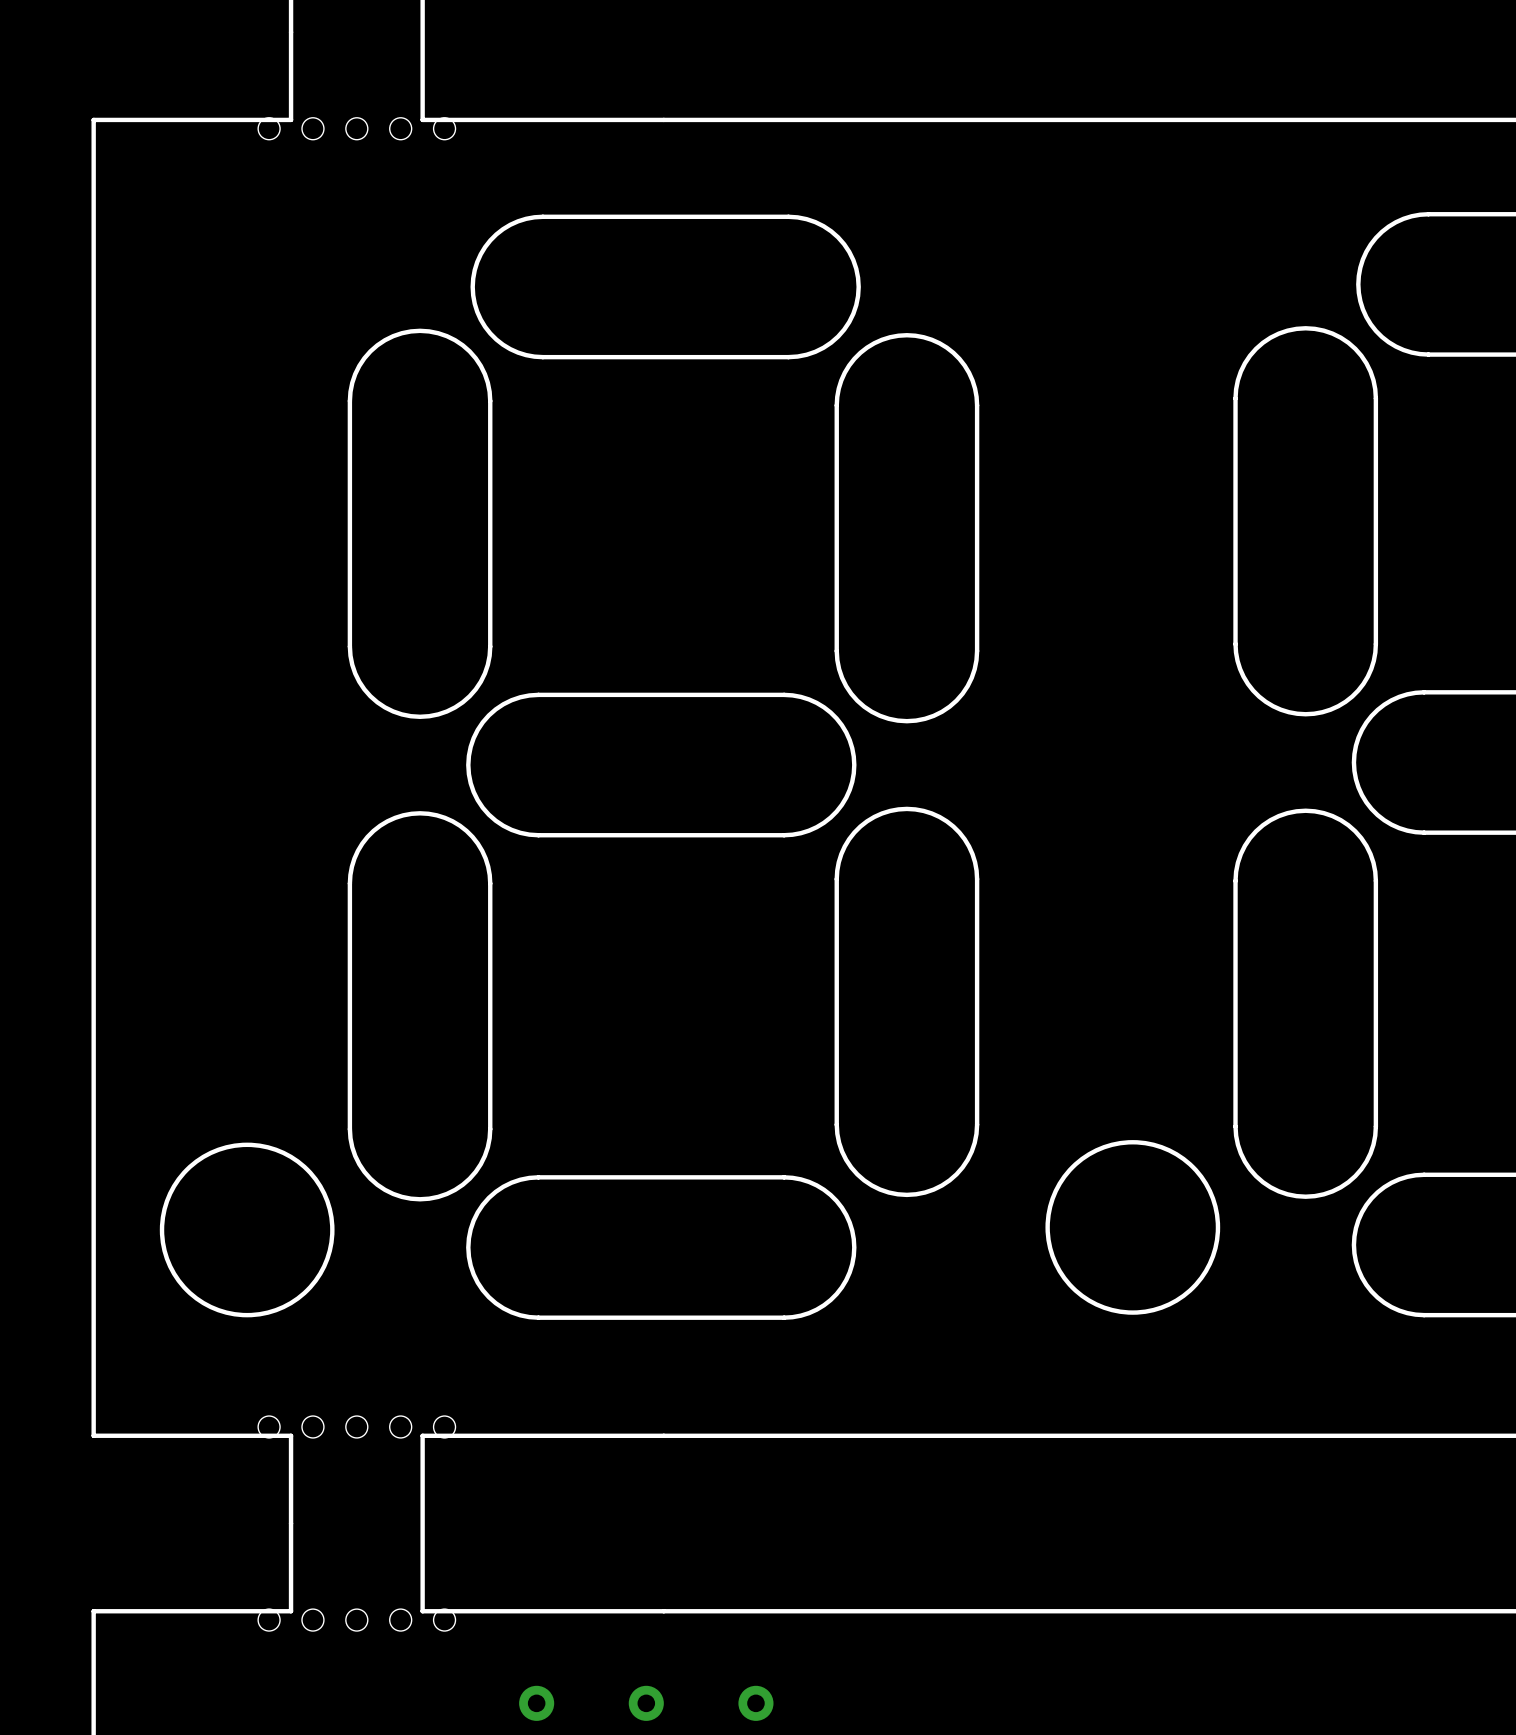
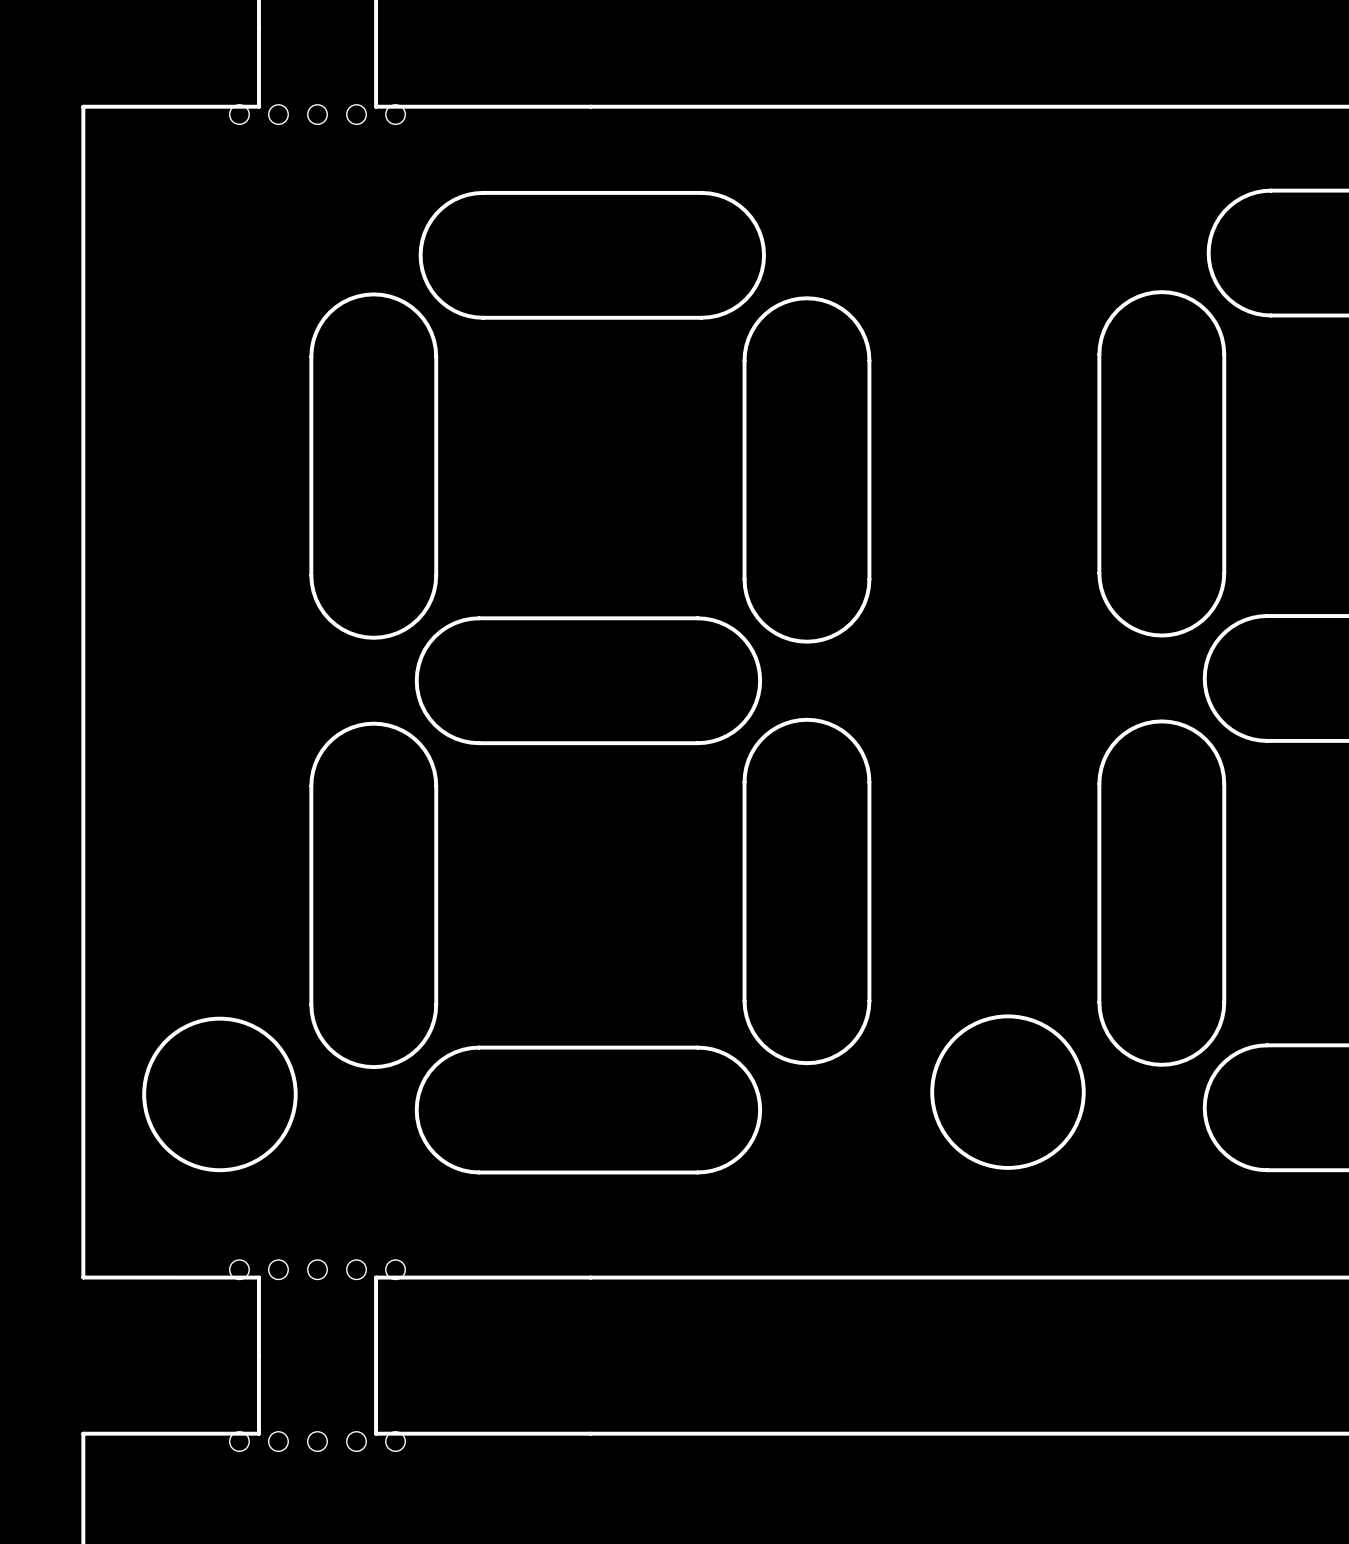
via: (536, 1703) -> none
via: (646, 1703) -> none
via: (755, 1703) -> none

